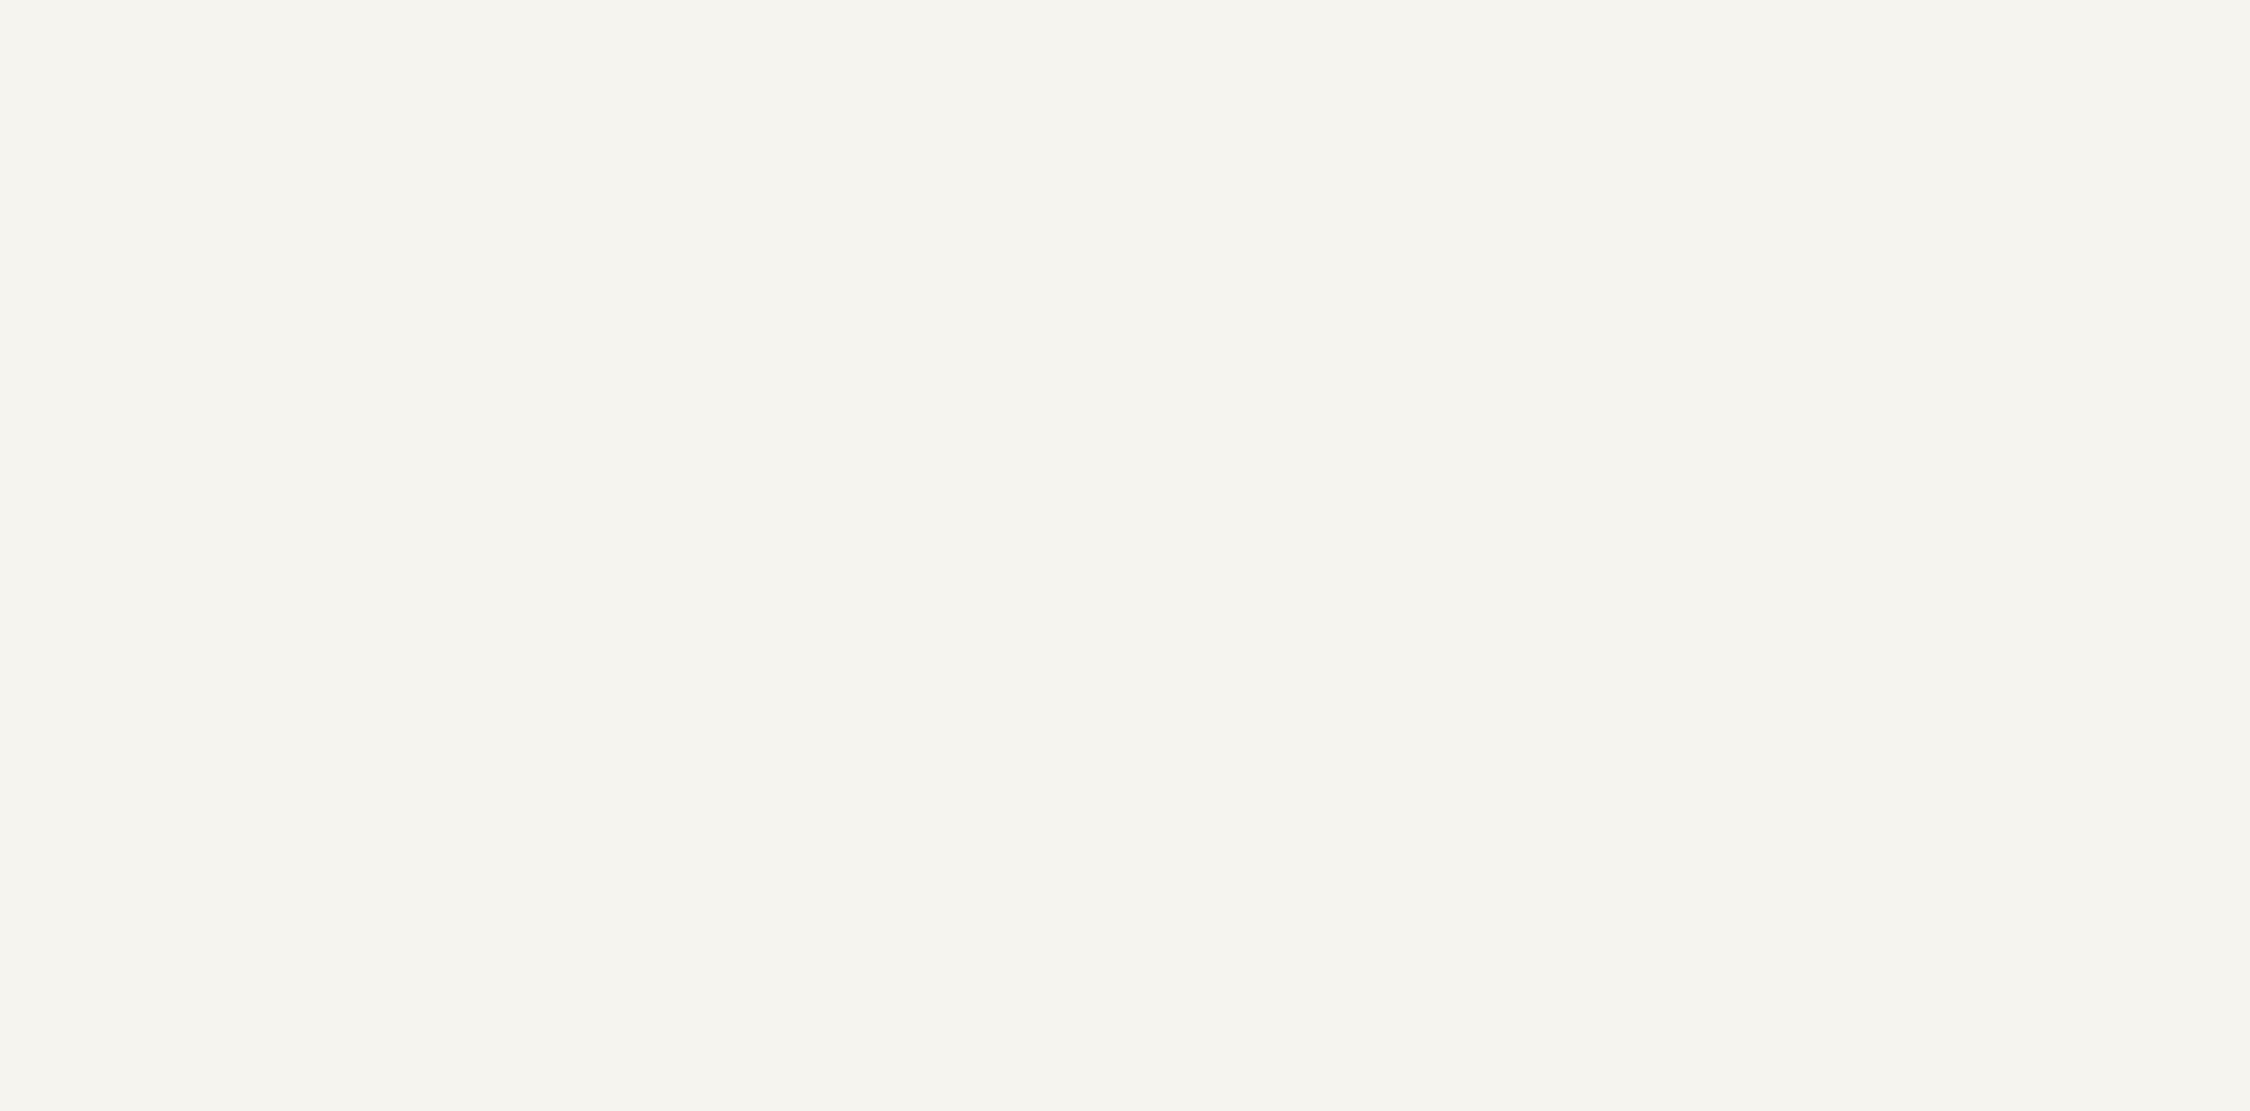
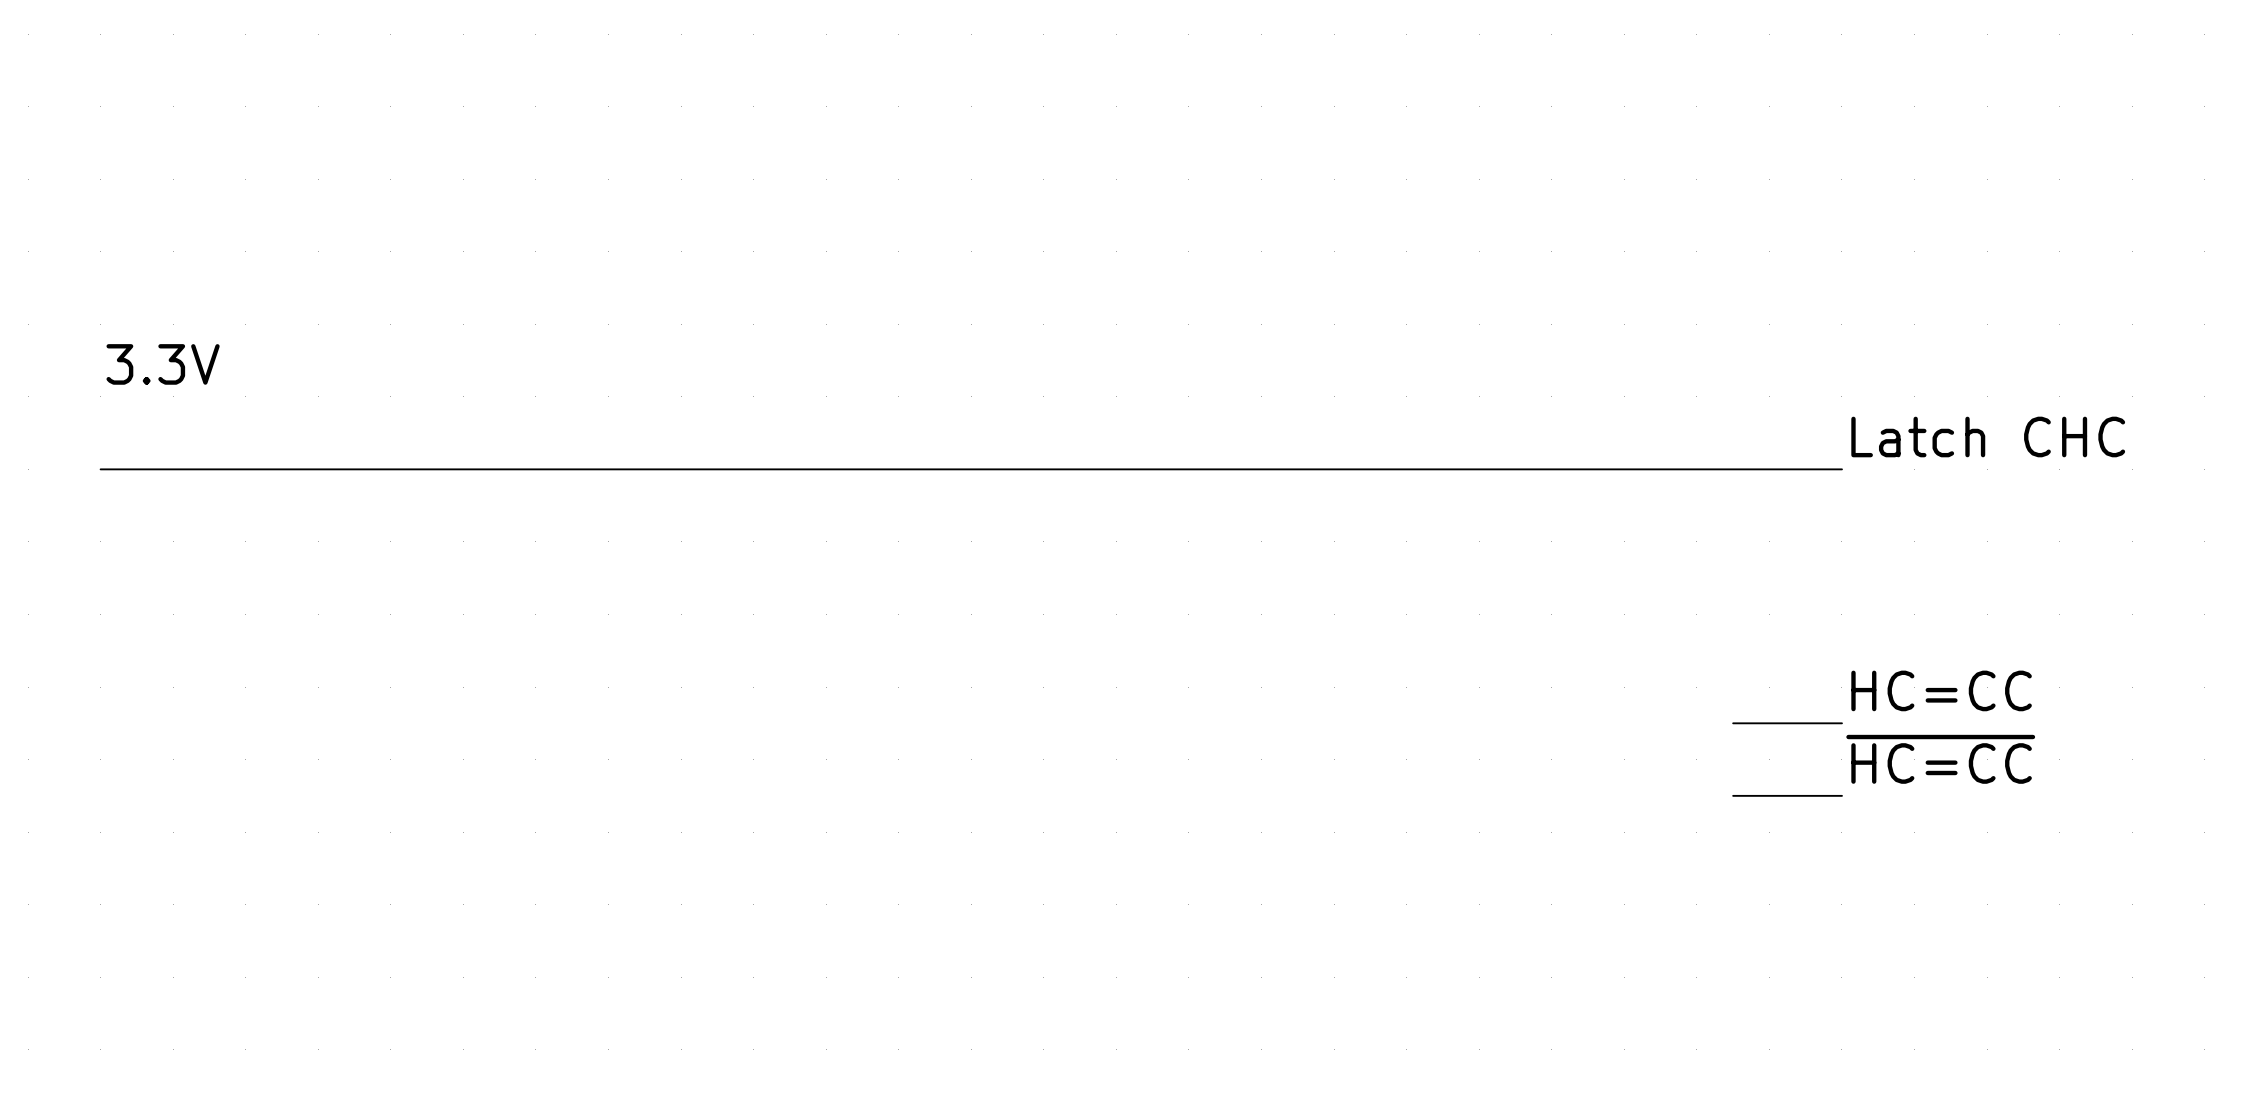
label: none -> 3.3V (163, 364)
label: none -> Latch CHC (1988, 436)
wire: none -> (100, 469) (1841, 469)
label: none -> HC=CC (1941, 690)
wire: none -> (1733, 723) (1841, 723)
label: none -> ~{HC=CC} (1940, 759)
wire: none -> (1733, 795) (1841, 795)

